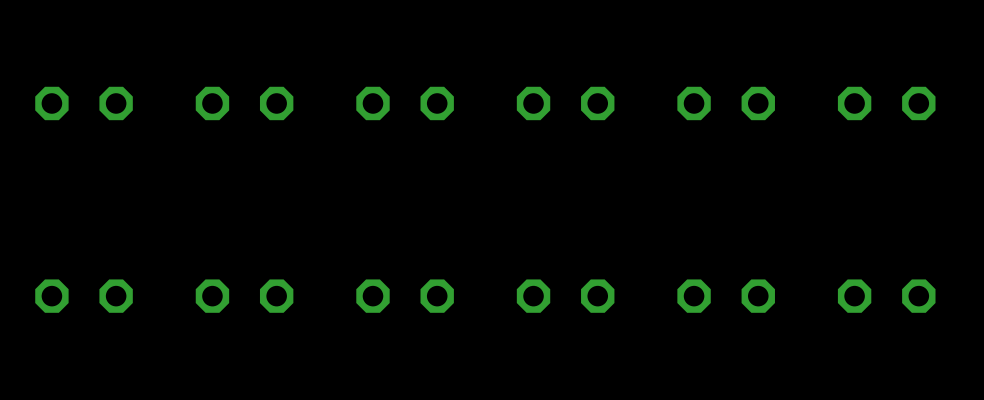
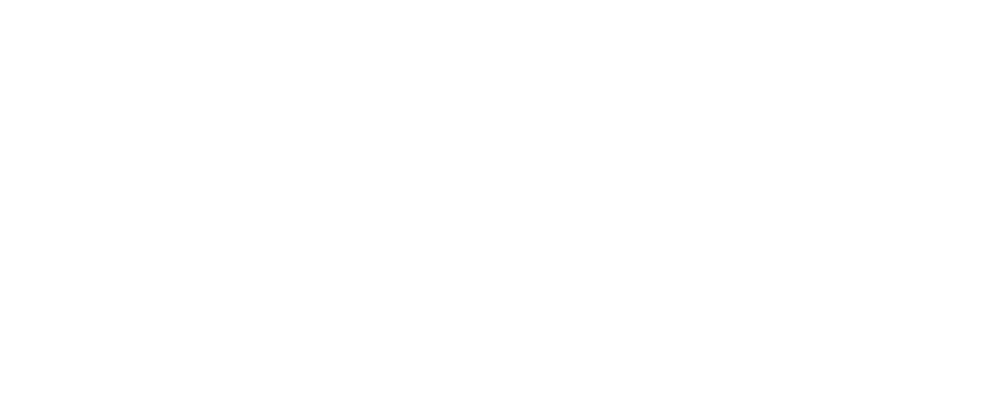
part: (84, 103) -> none
part: (244, 103) -> none
part: (405, 103) -> none
part: (565, 103) -> none
part: (726, 103) -> none
part: (886, 103) -> none
part: (84, 296) -> none
part: (244, 296) -> none
part: (405, 296) -> none
part: (565, 296) -> none
part: (726, 296) -> none
part: (886, 296) -> none

